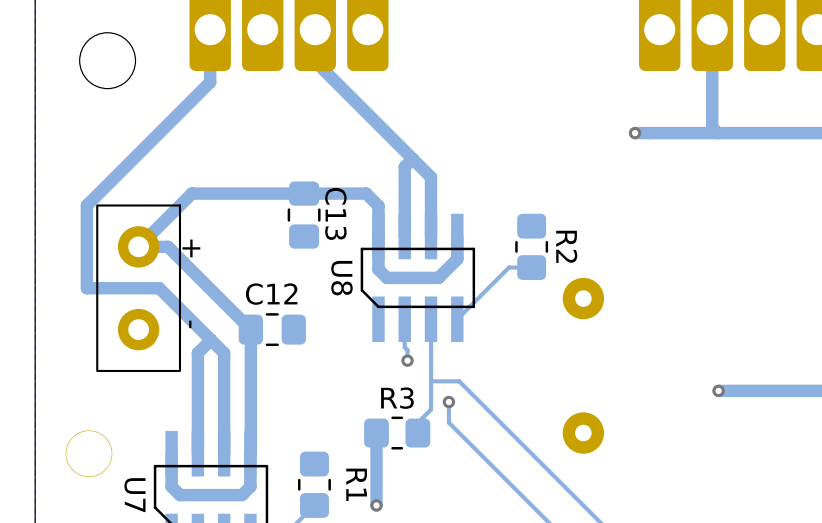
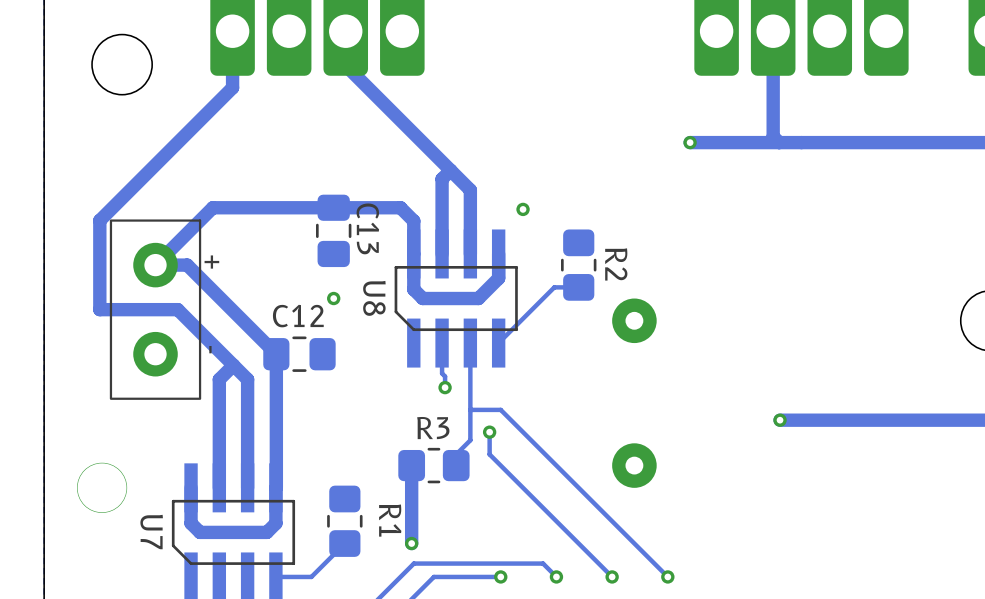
via: none -> (523, 209)
via: none -> (333, 298)

